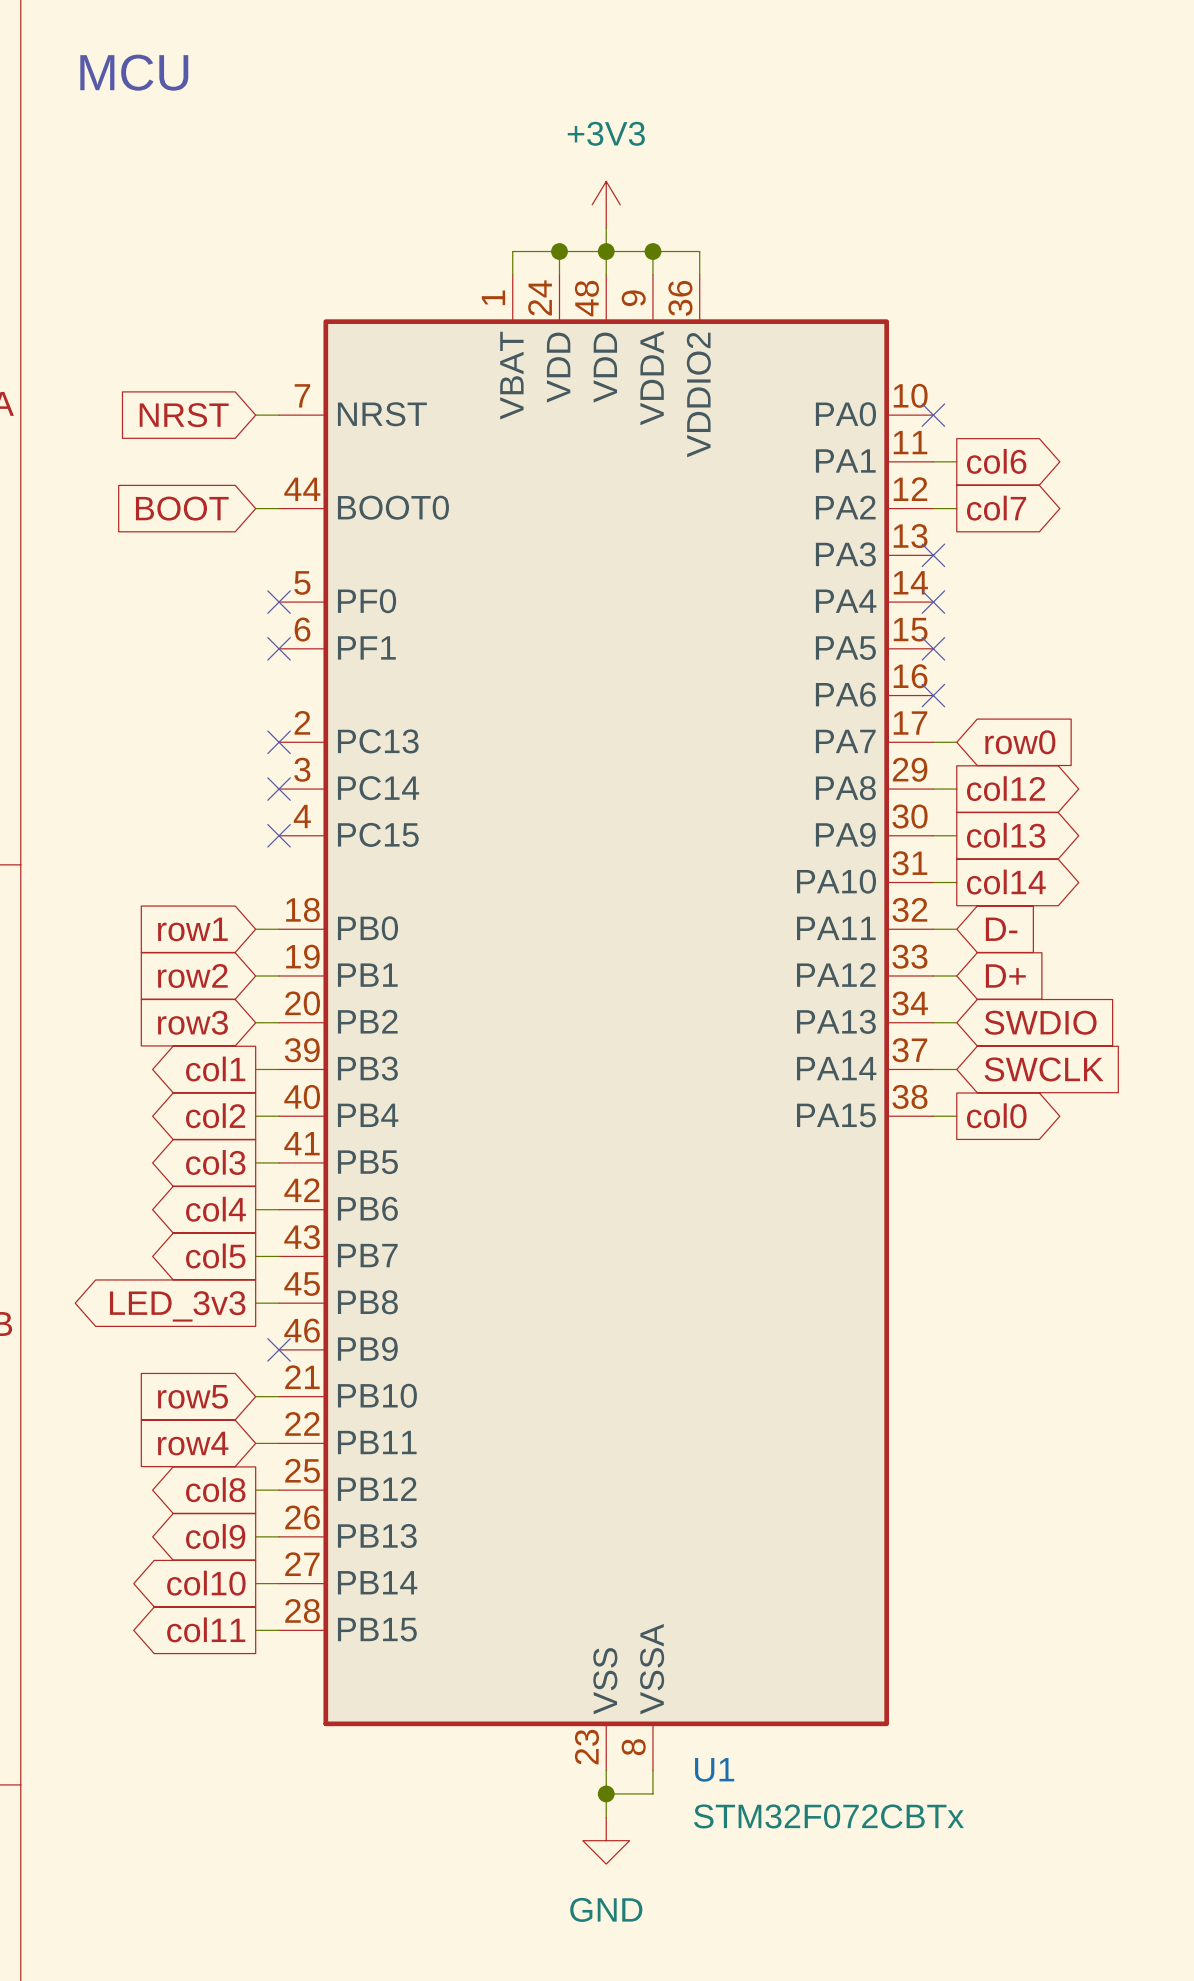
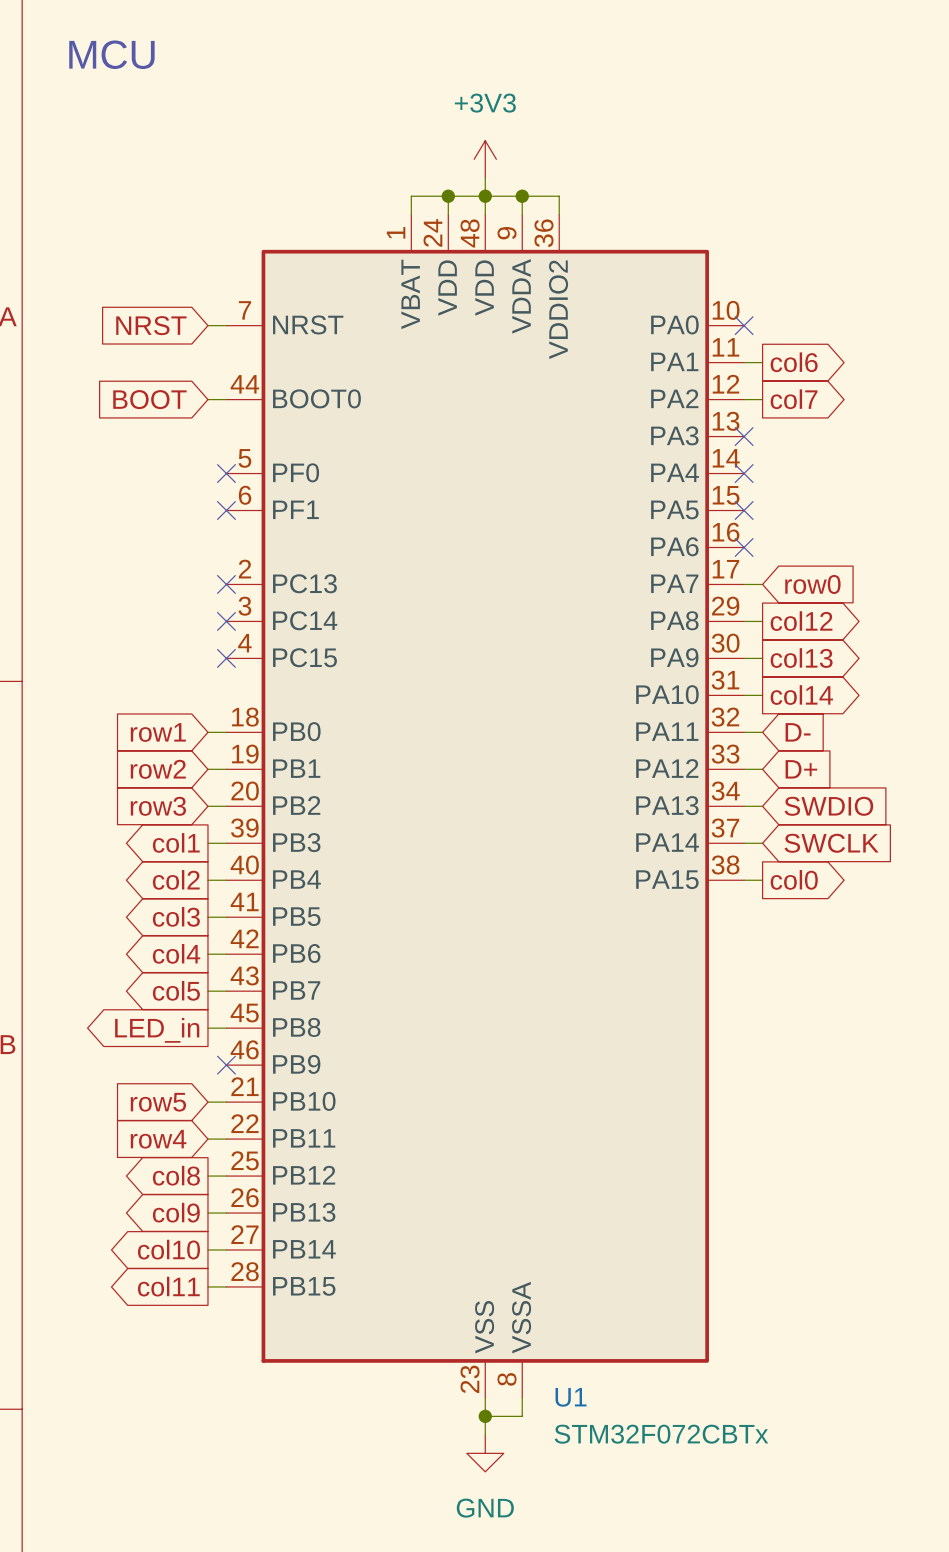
global label: LED_3v3 (177, 1306) -> LED_in (157, 1030)

